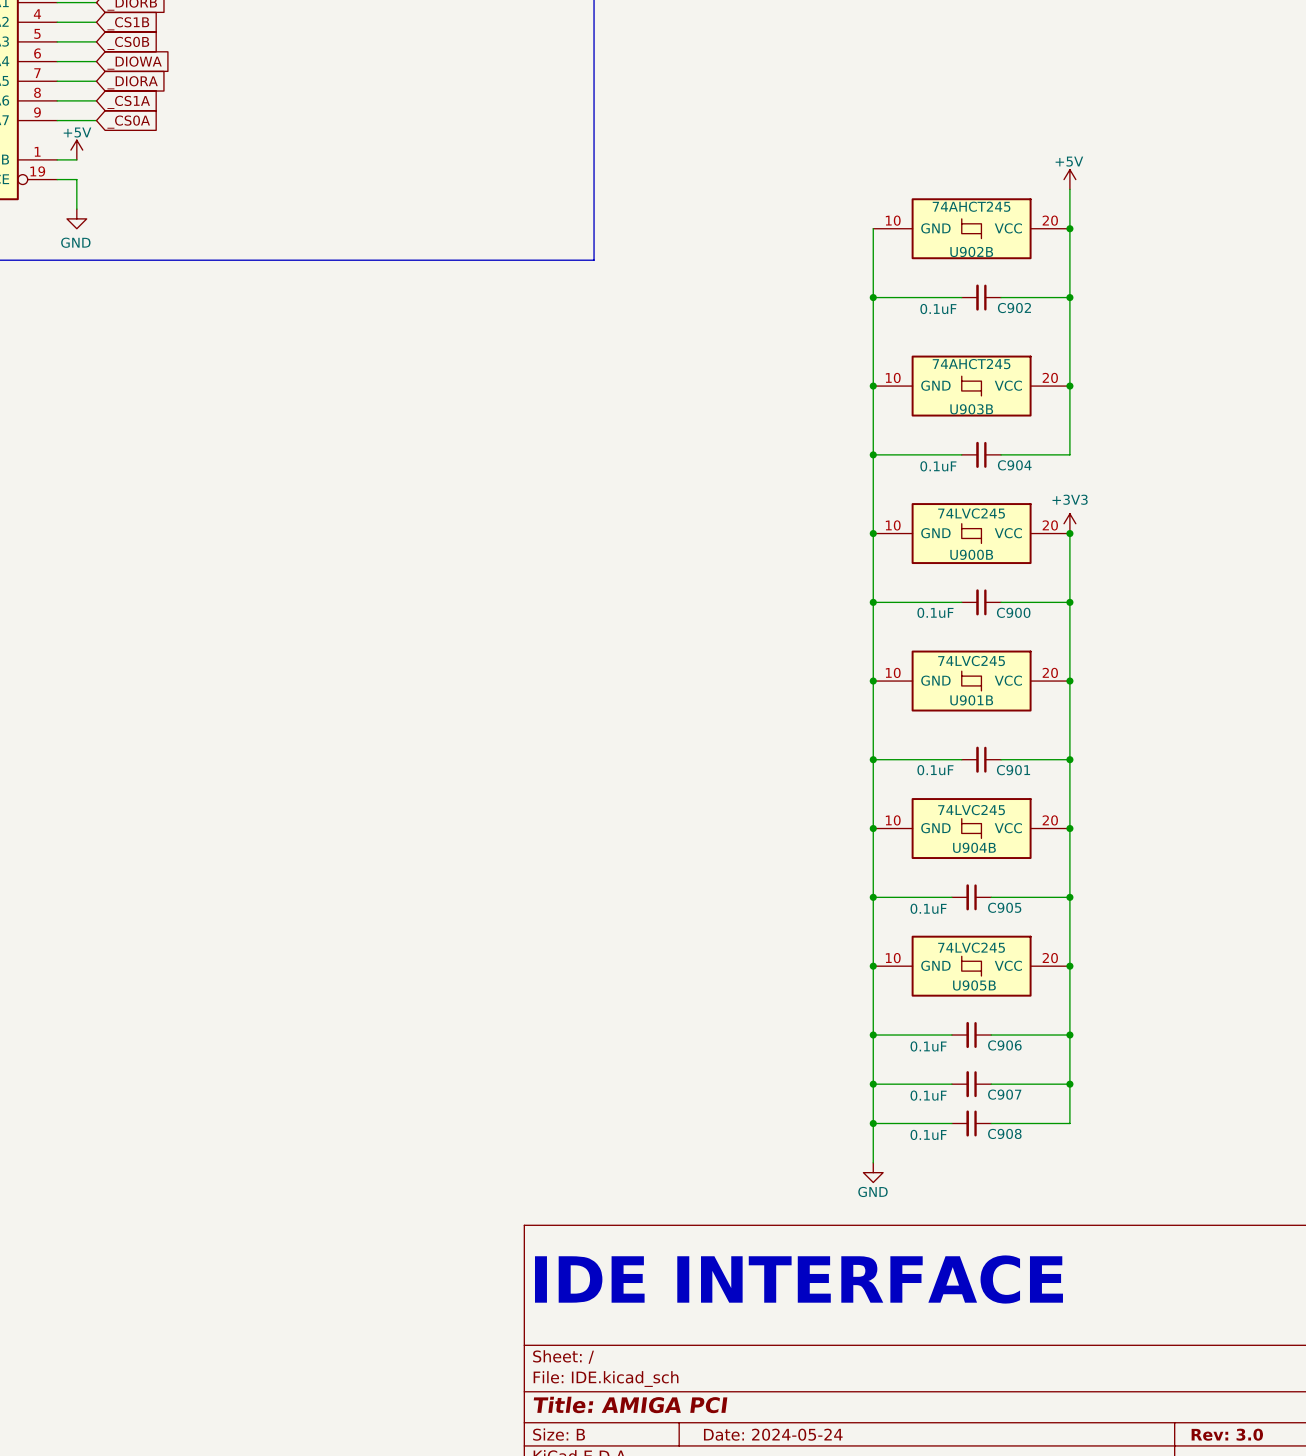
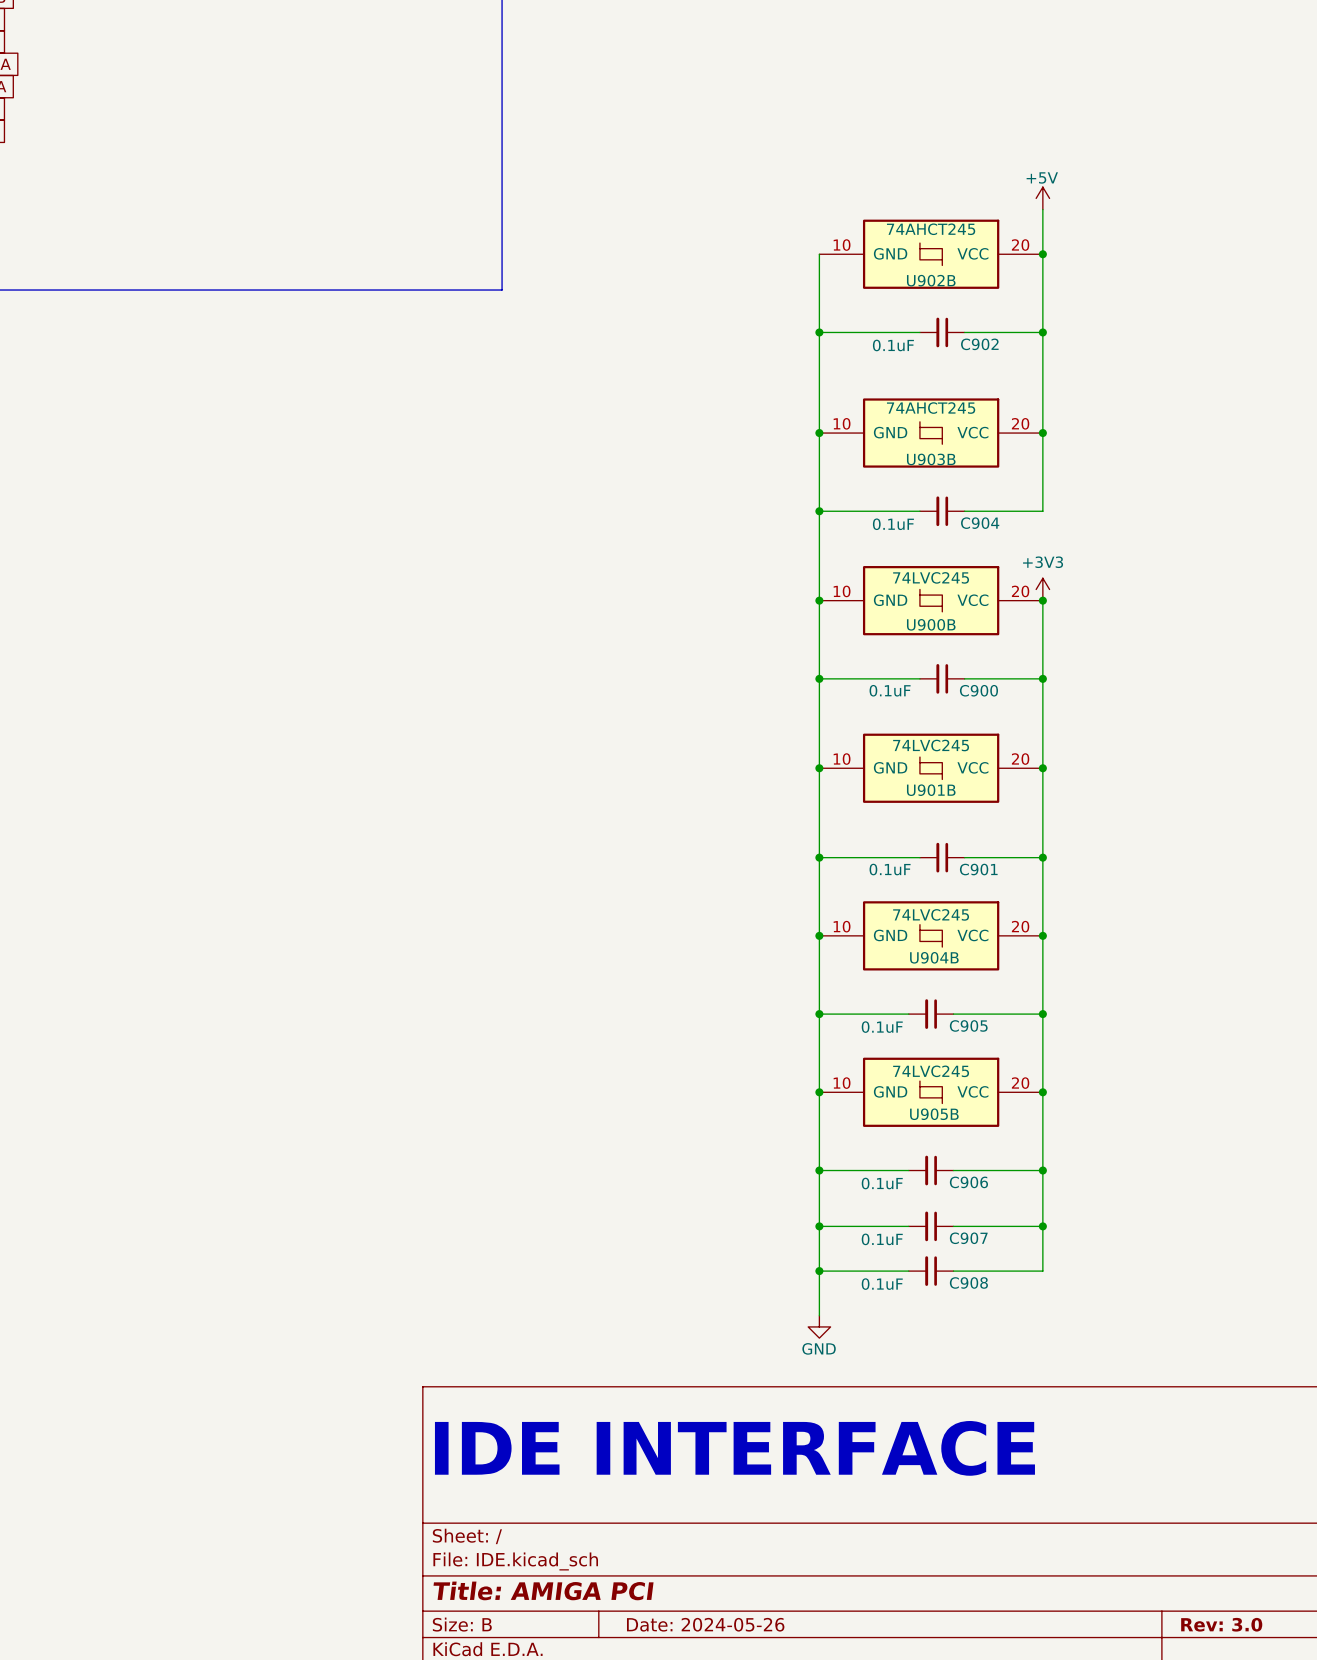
title block: Date: 2024-05-24 (773, 1434) -> Date: 2024-05-26 (705, 1624)

